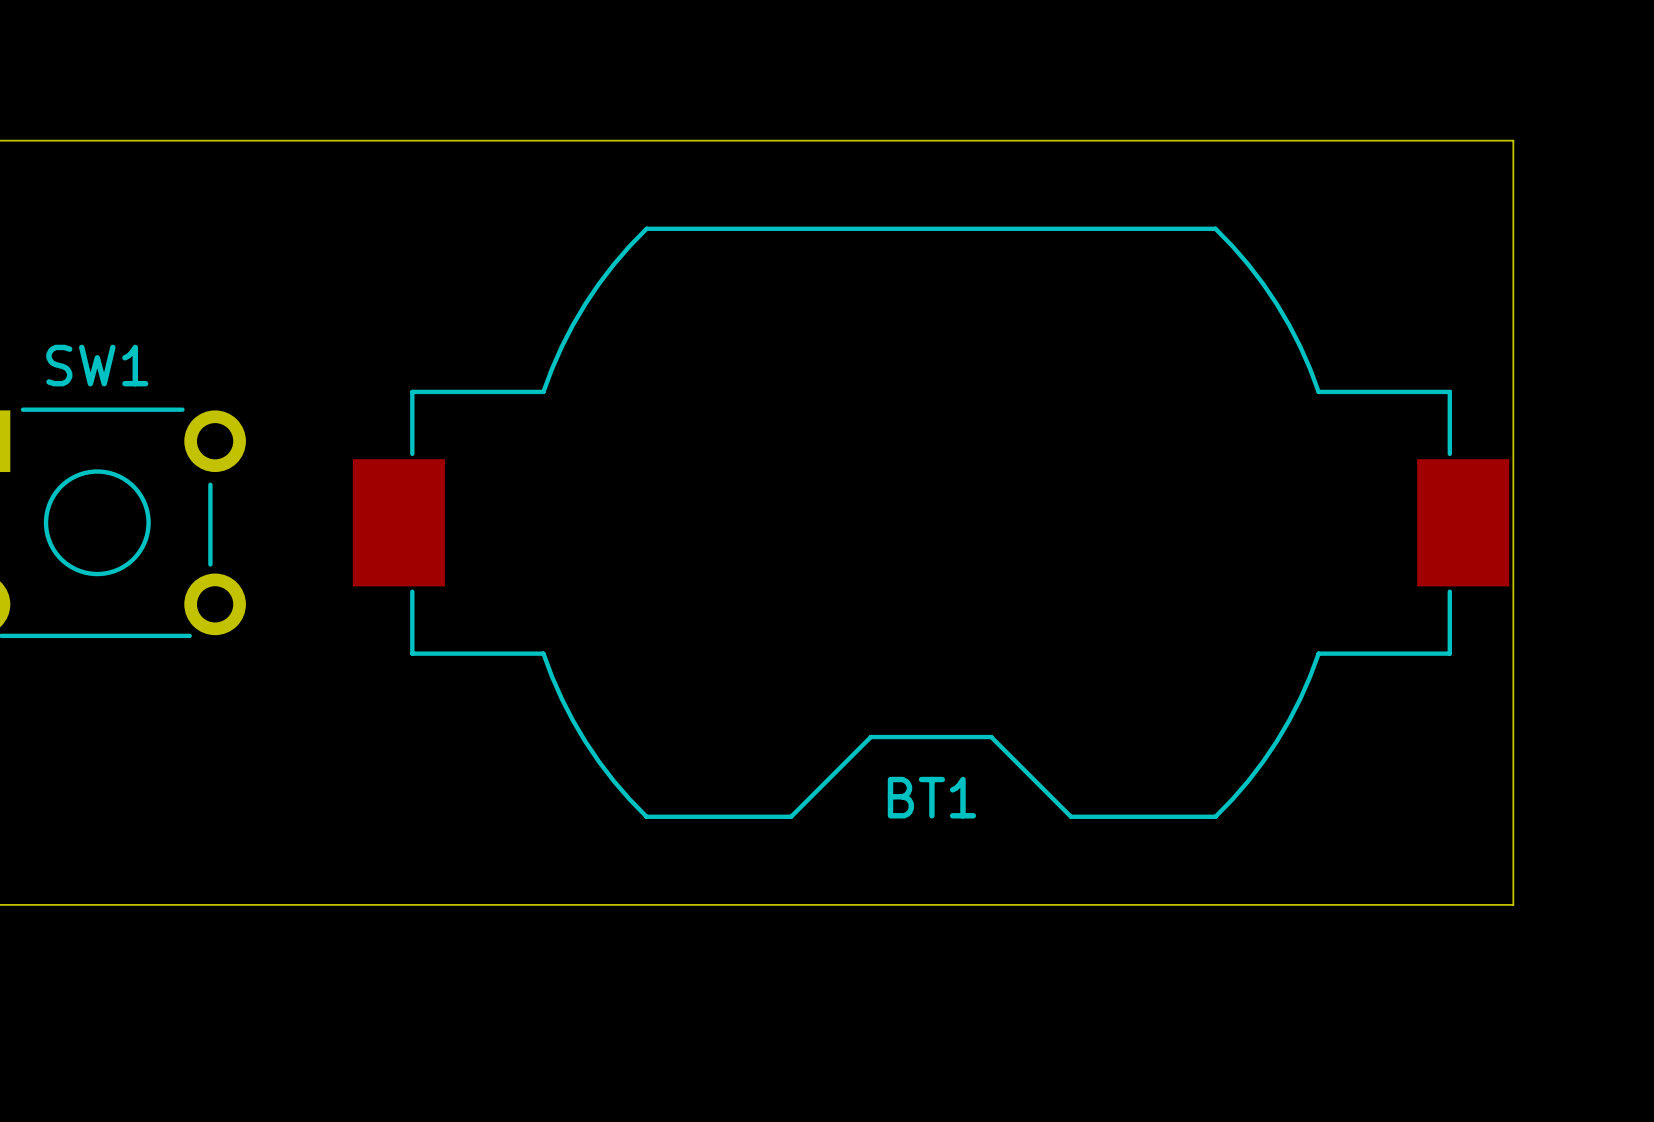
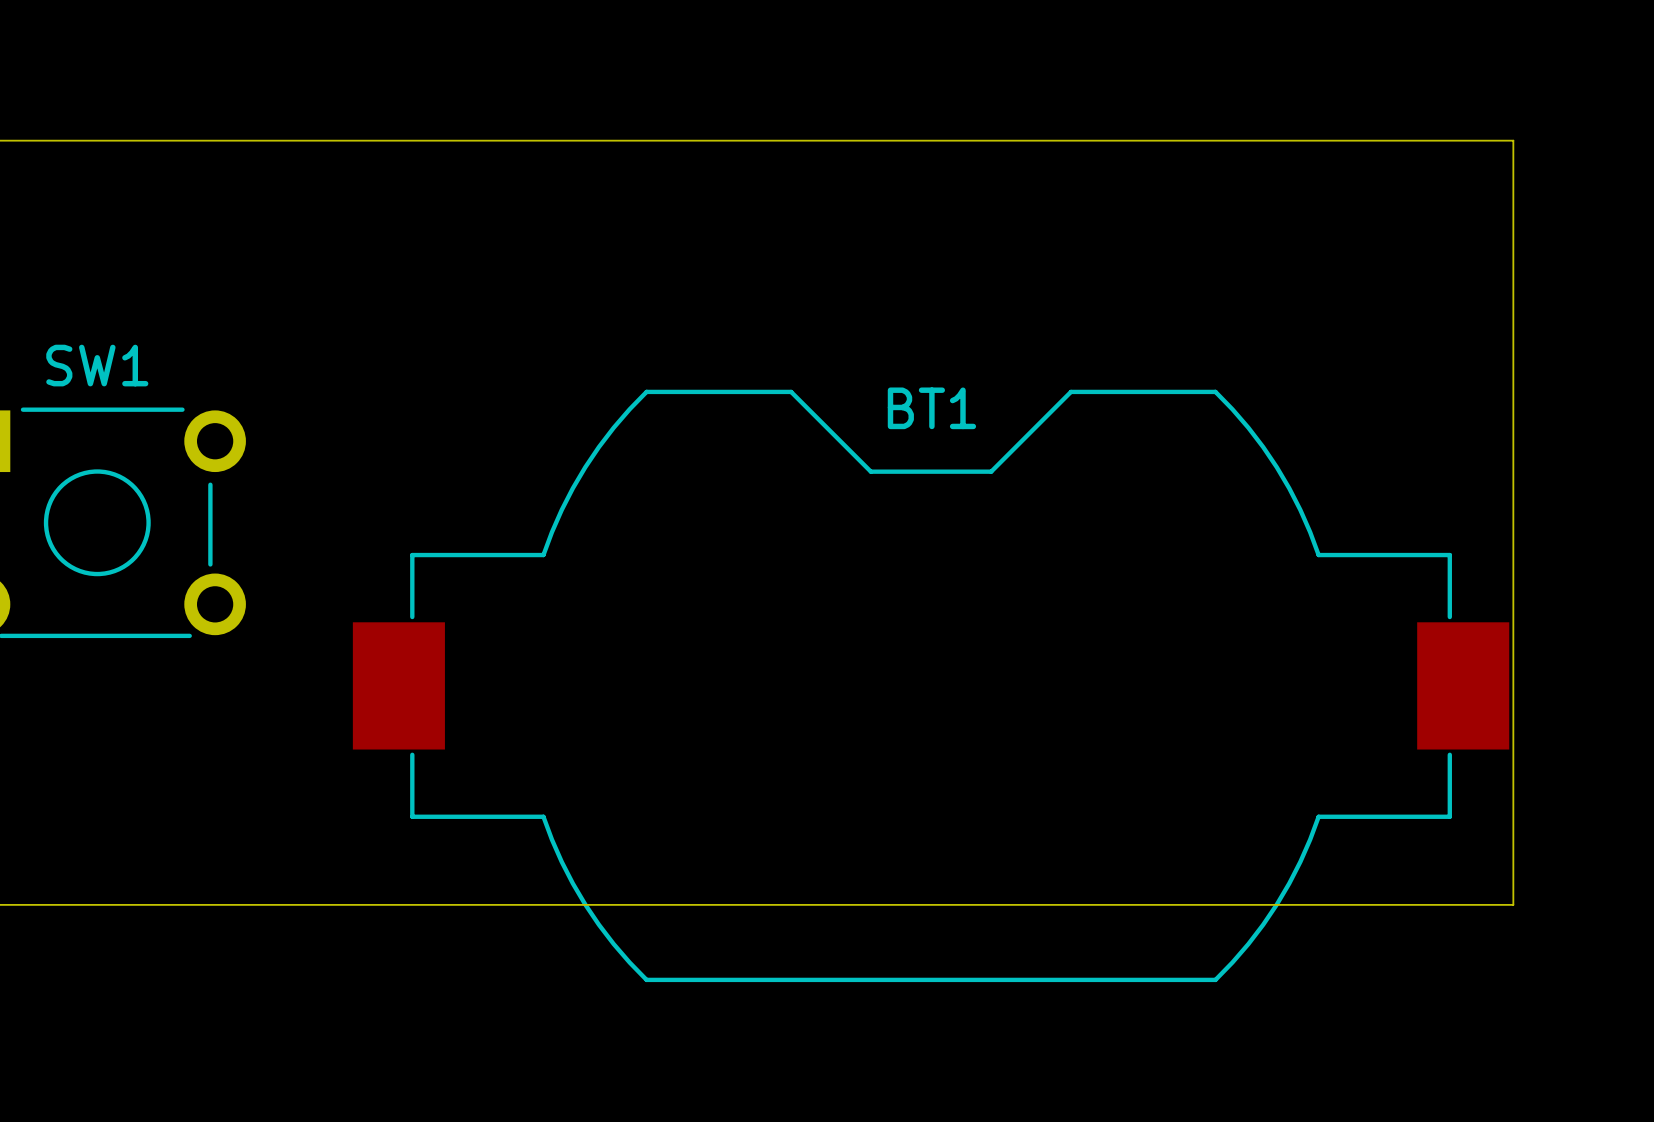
BT1 rotation: 0° (931, 522) -> 180° (931, 685)

